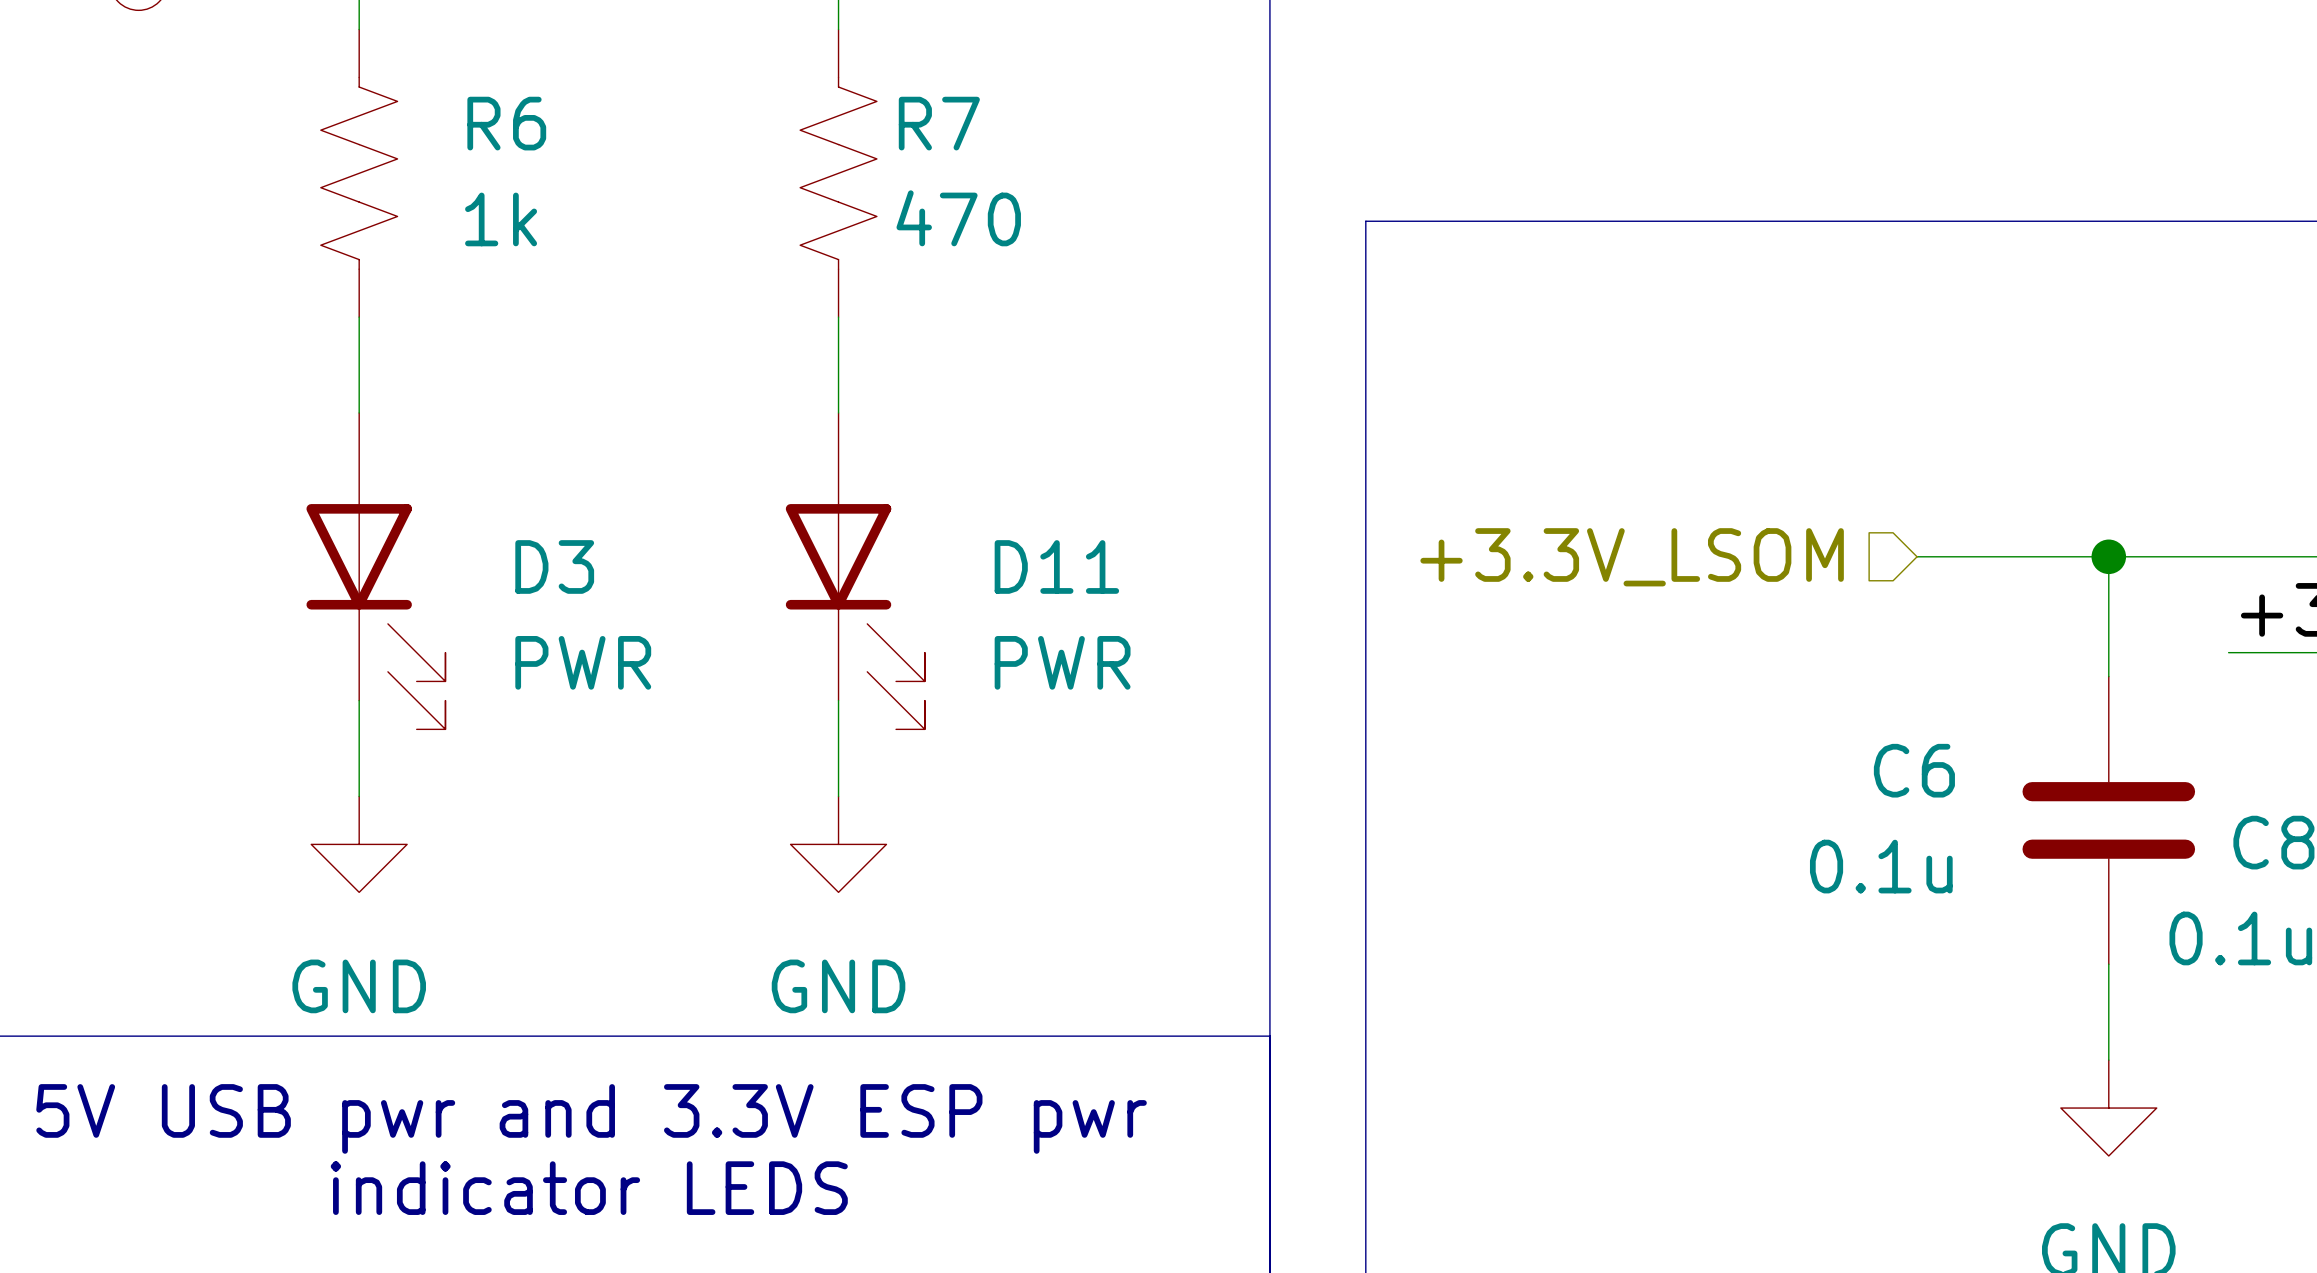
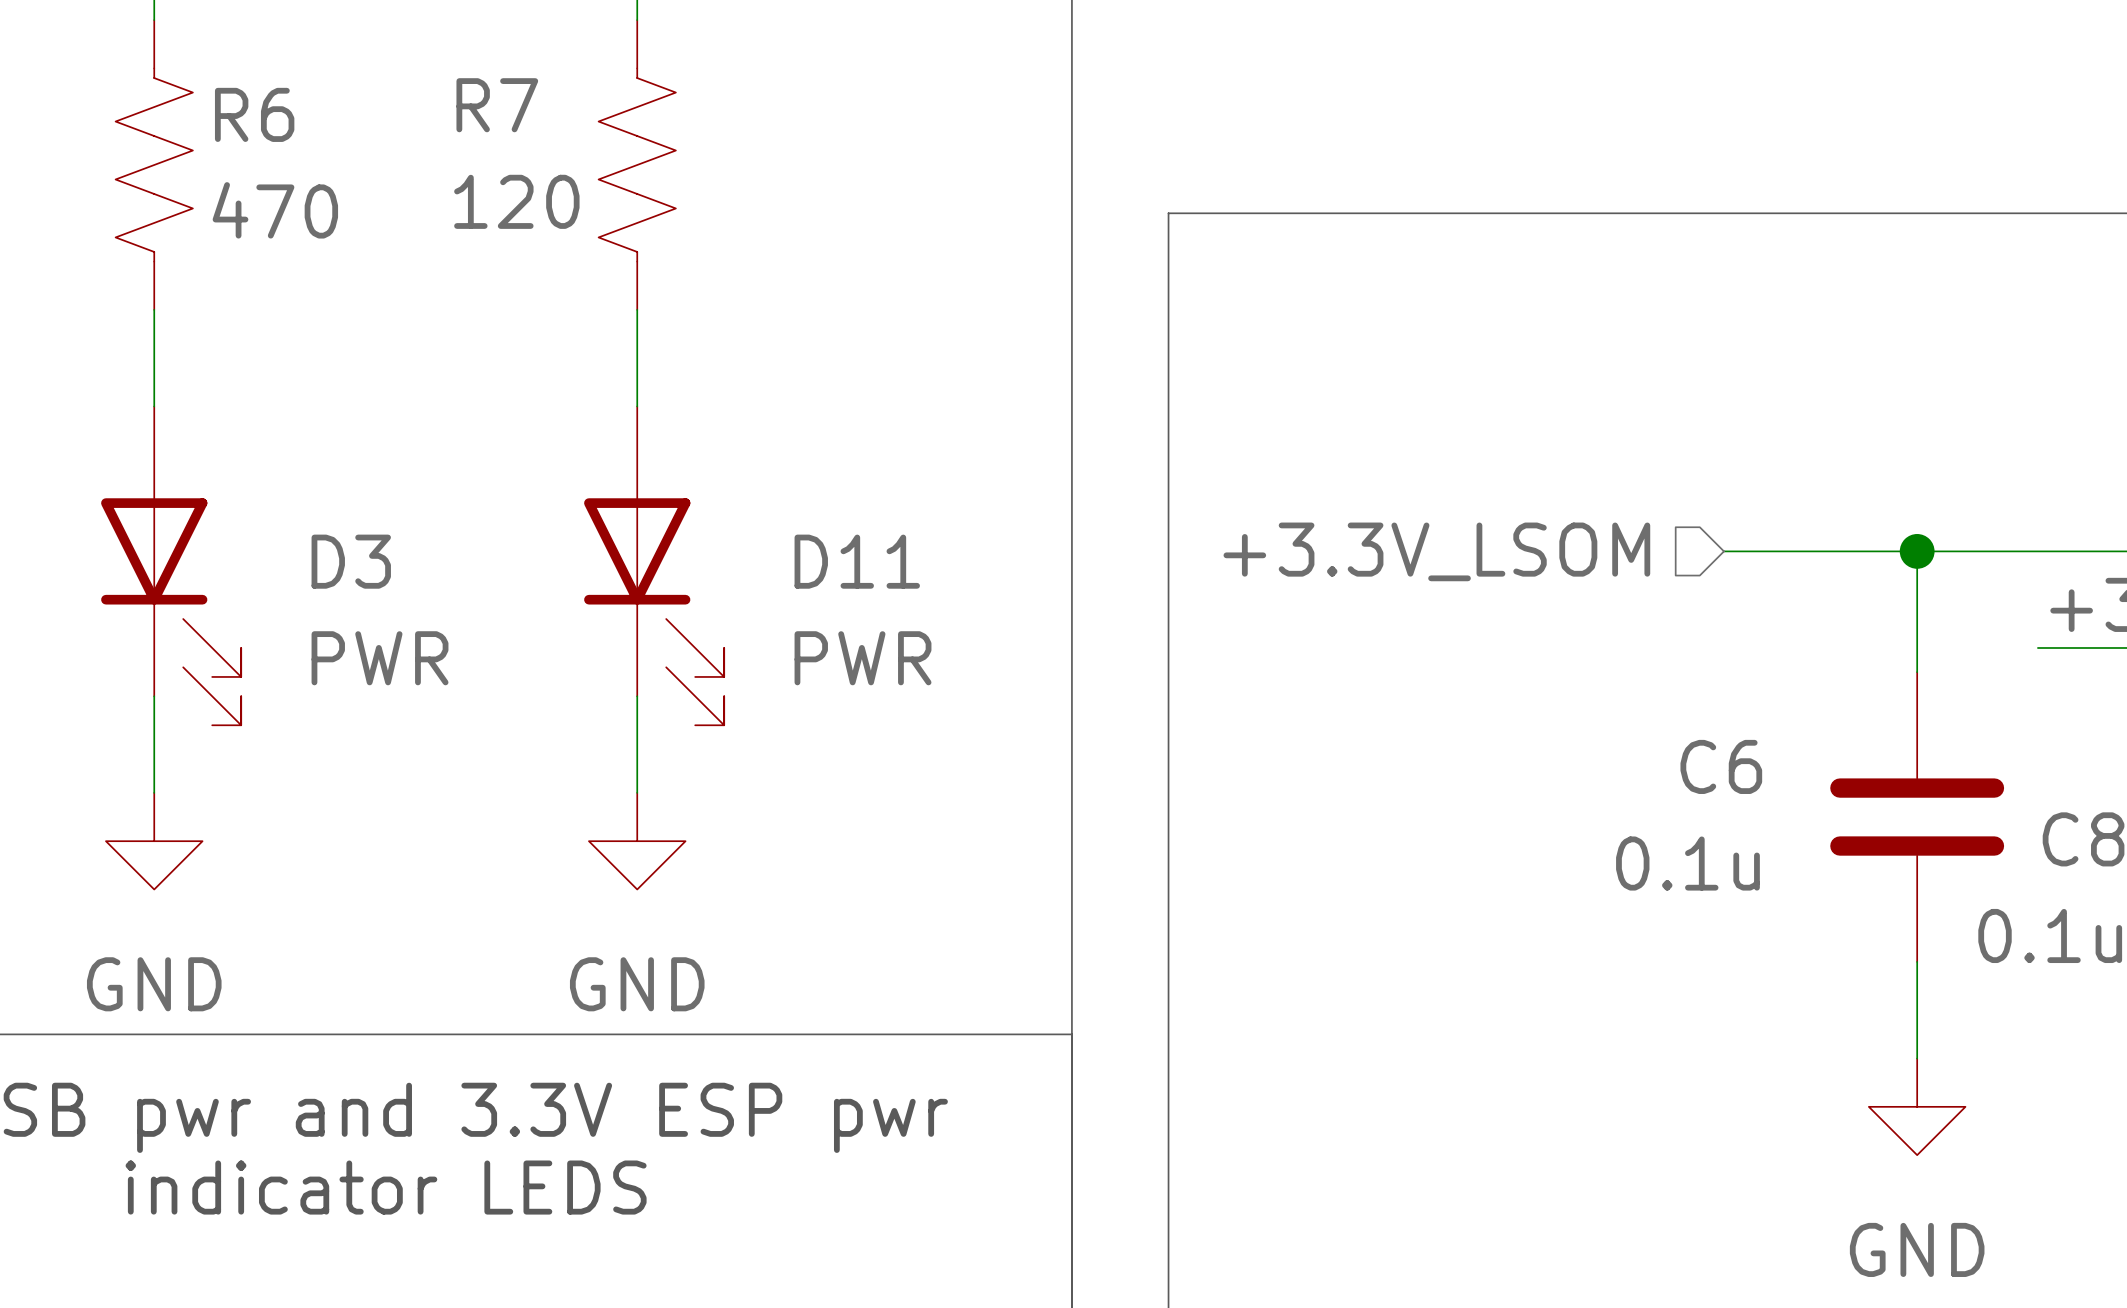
R6 name position: R6 (506, 123) -> R6 (254, 114)
R7 name position: R7 (939, 123) -> R7 (497, 105)
R7 value: 470 (958, 218) -> 120 (516, 201)
R6 value: 1k (501, 219) -> 470 (275, 210)

